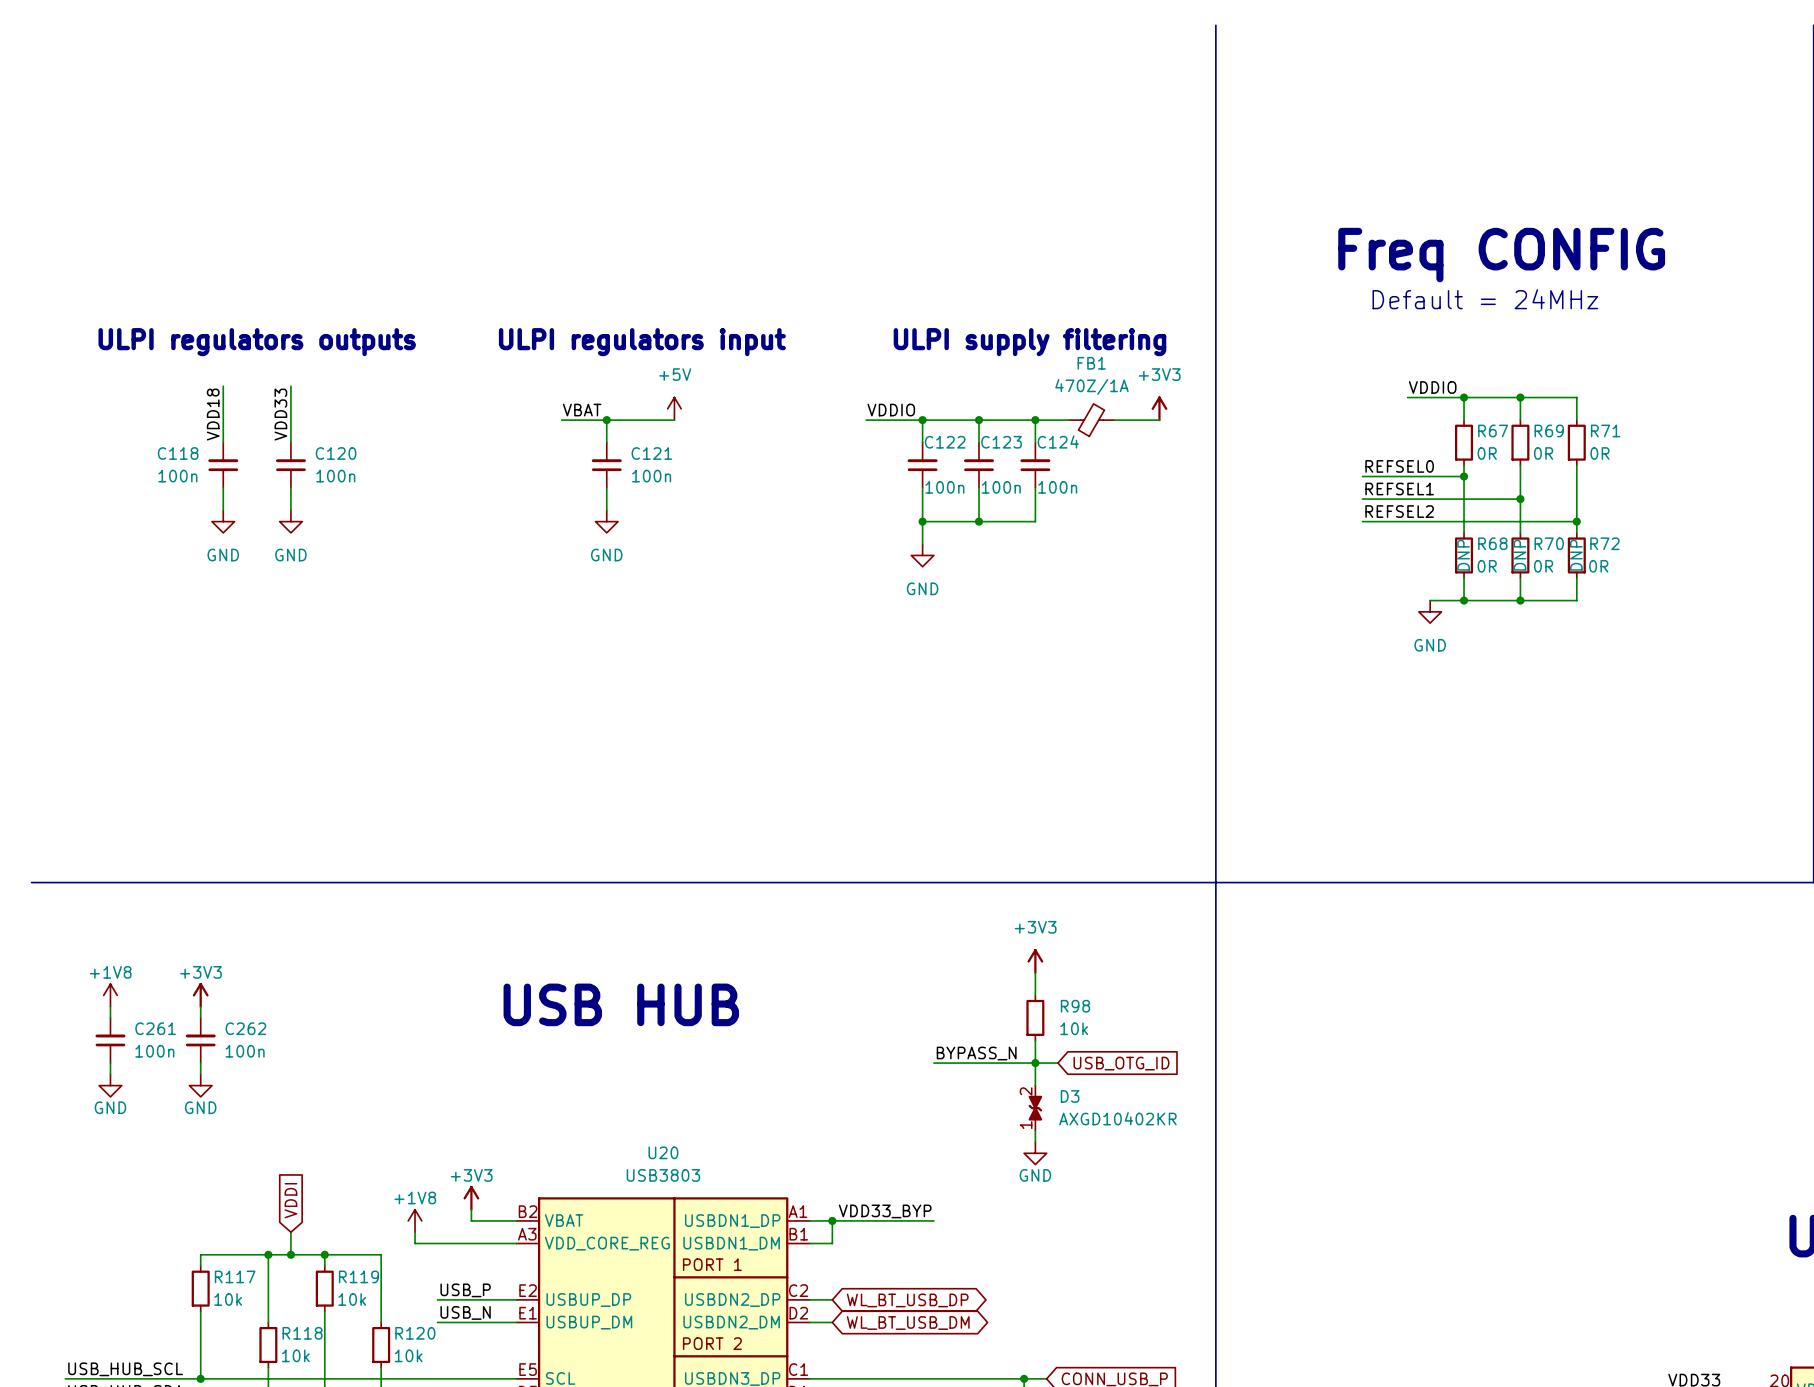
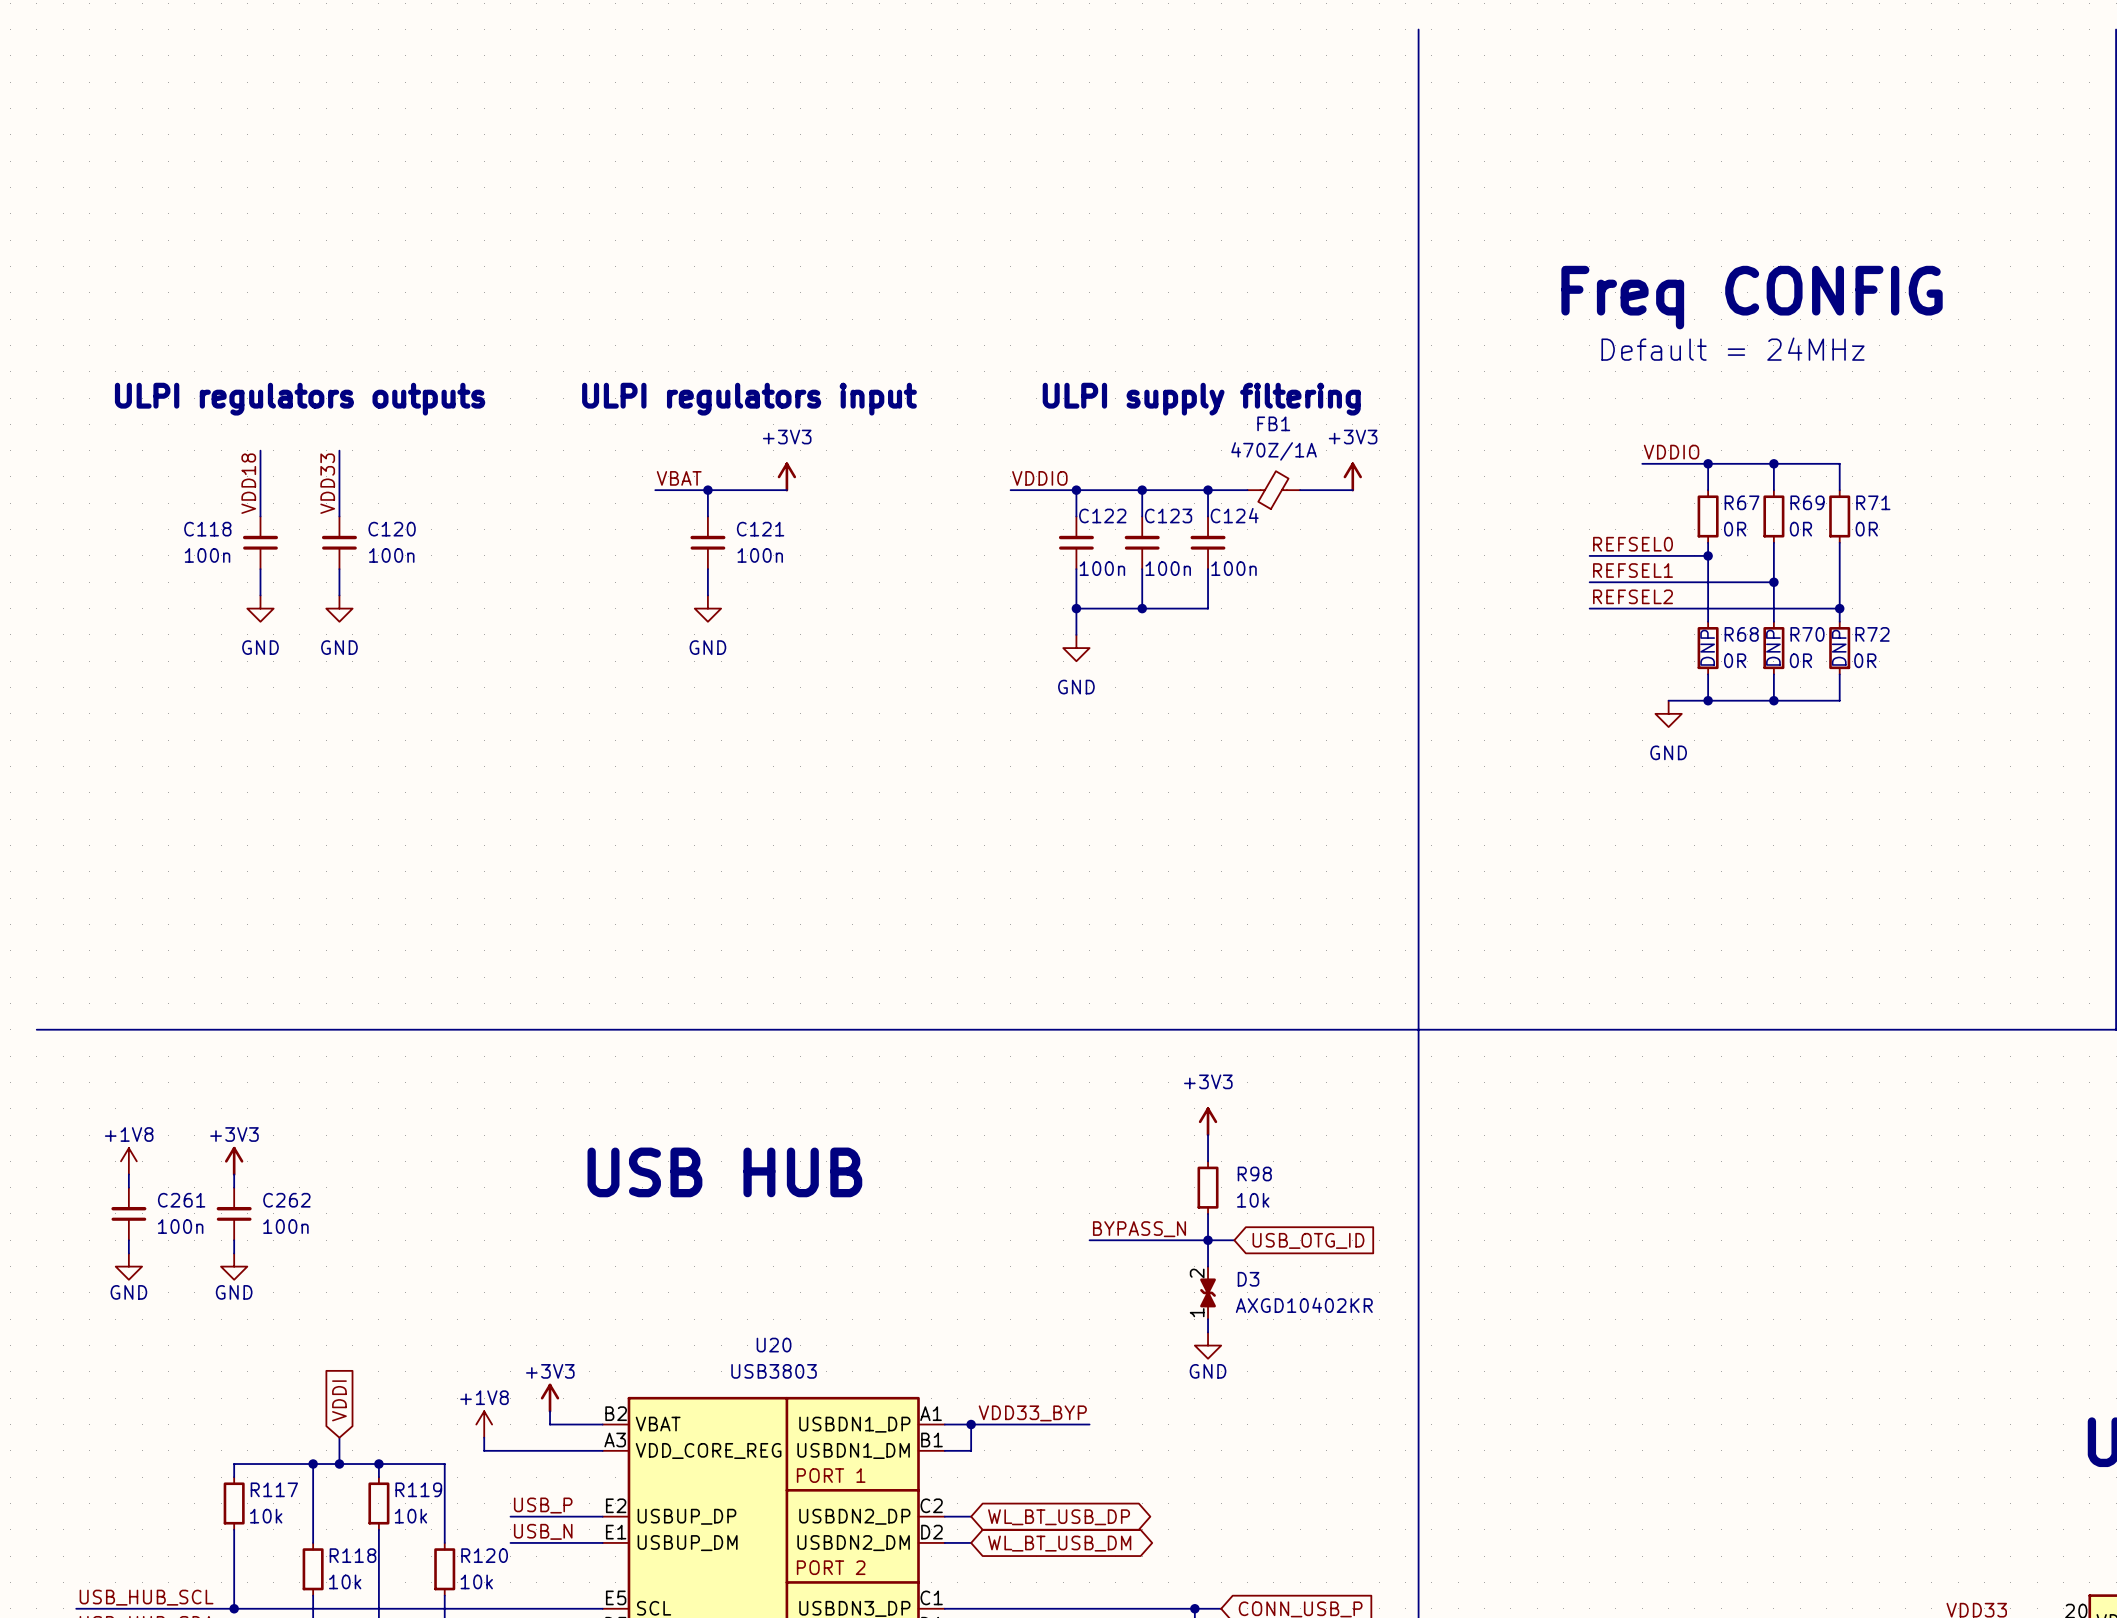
power symbol: +5V (674, 408) -> +3V3 (786, 476)

